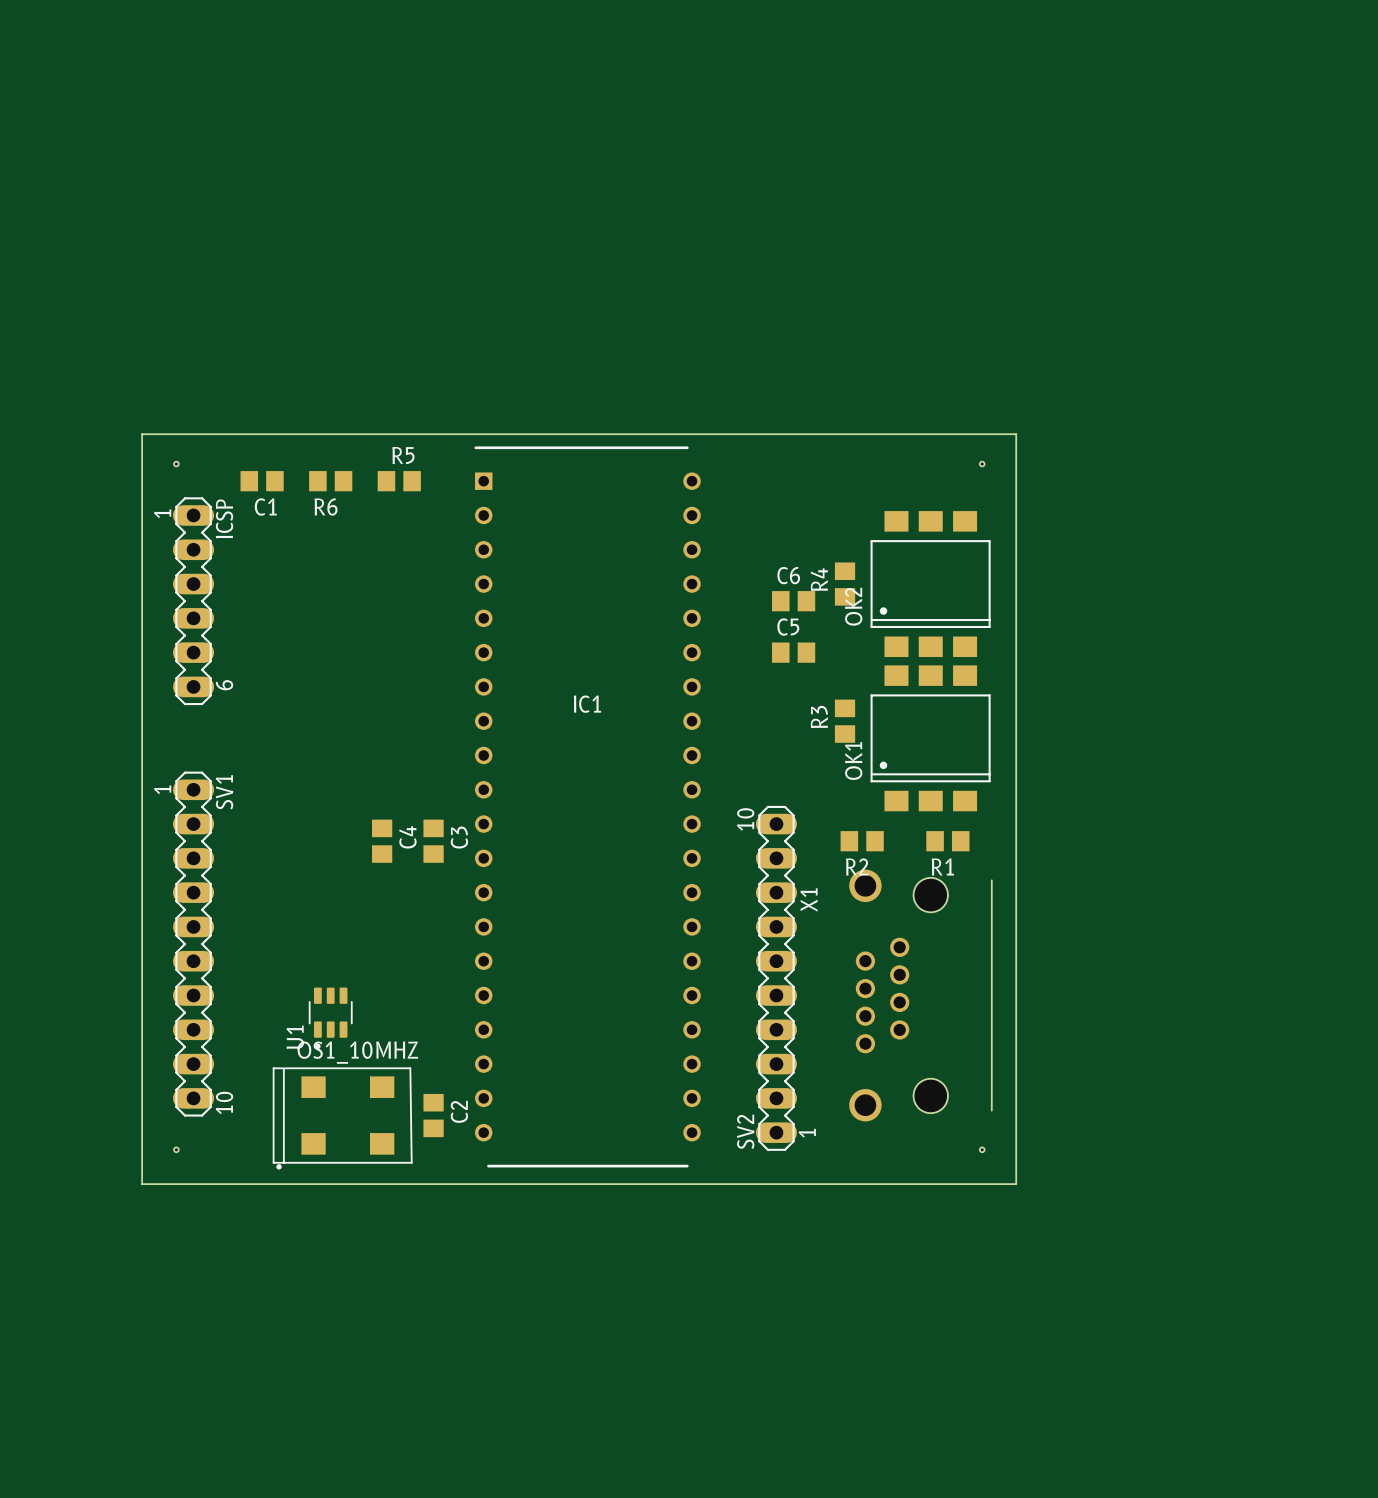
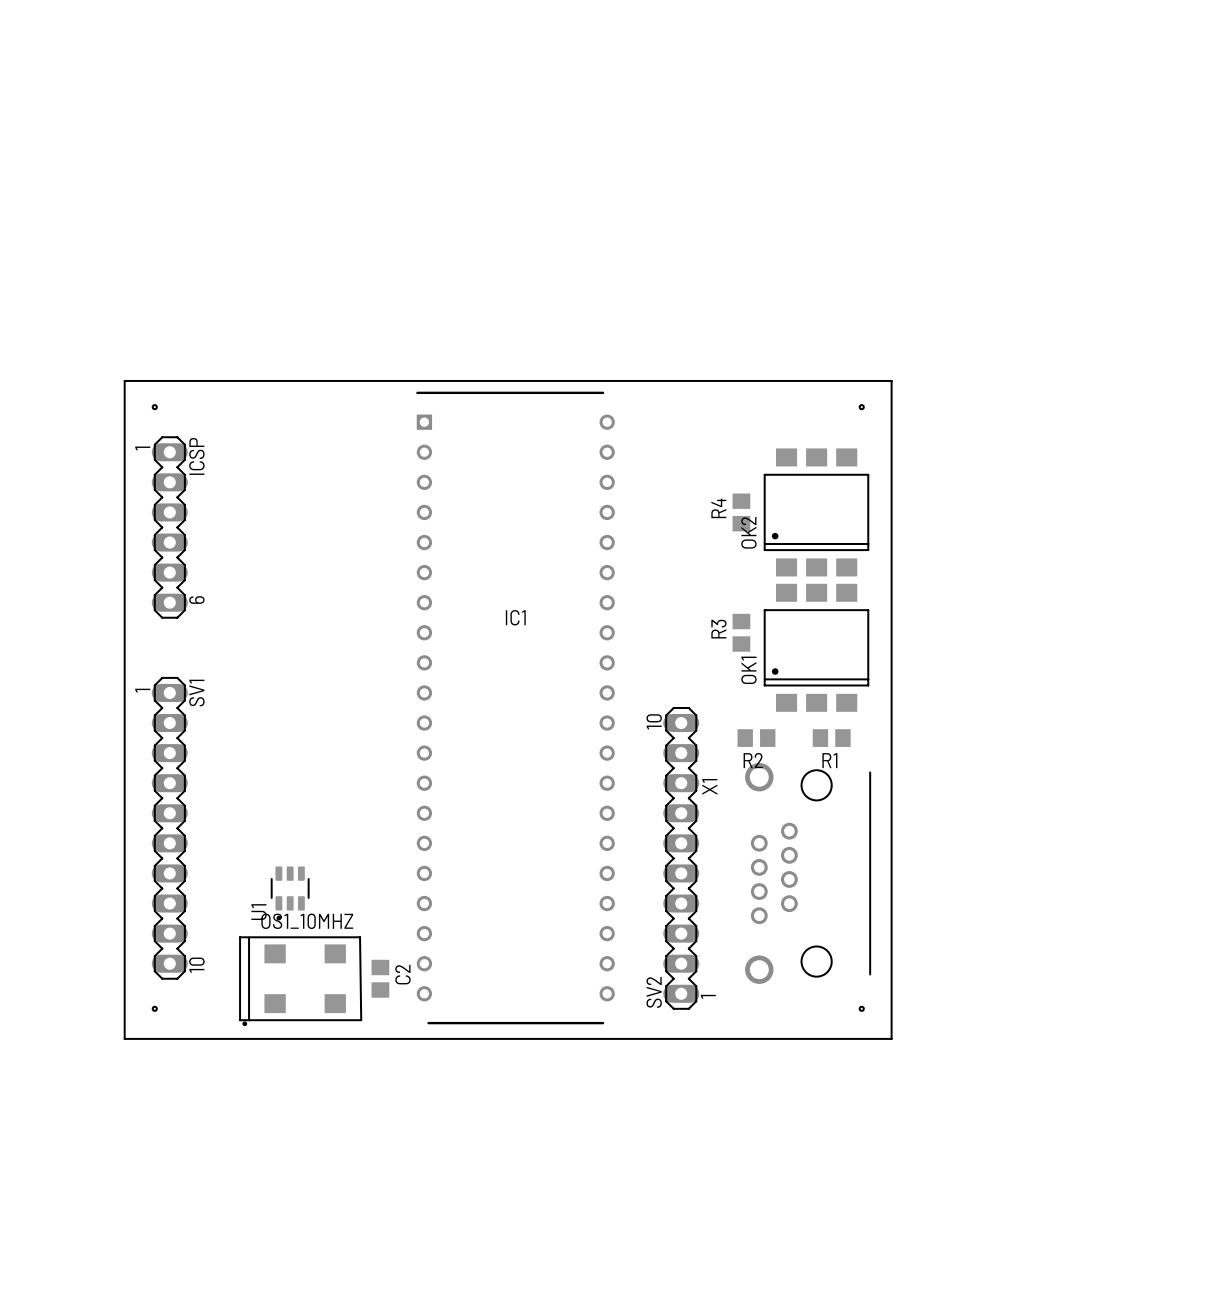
C1: (262, 481) -> none
R6: (330, 481) -> none
R5: (399, 481) -> none
C6: (793, 601) -> none
C5: (793, 652) -> none
C4: (382, 841) -> none
C3: (433, 841) -> none

